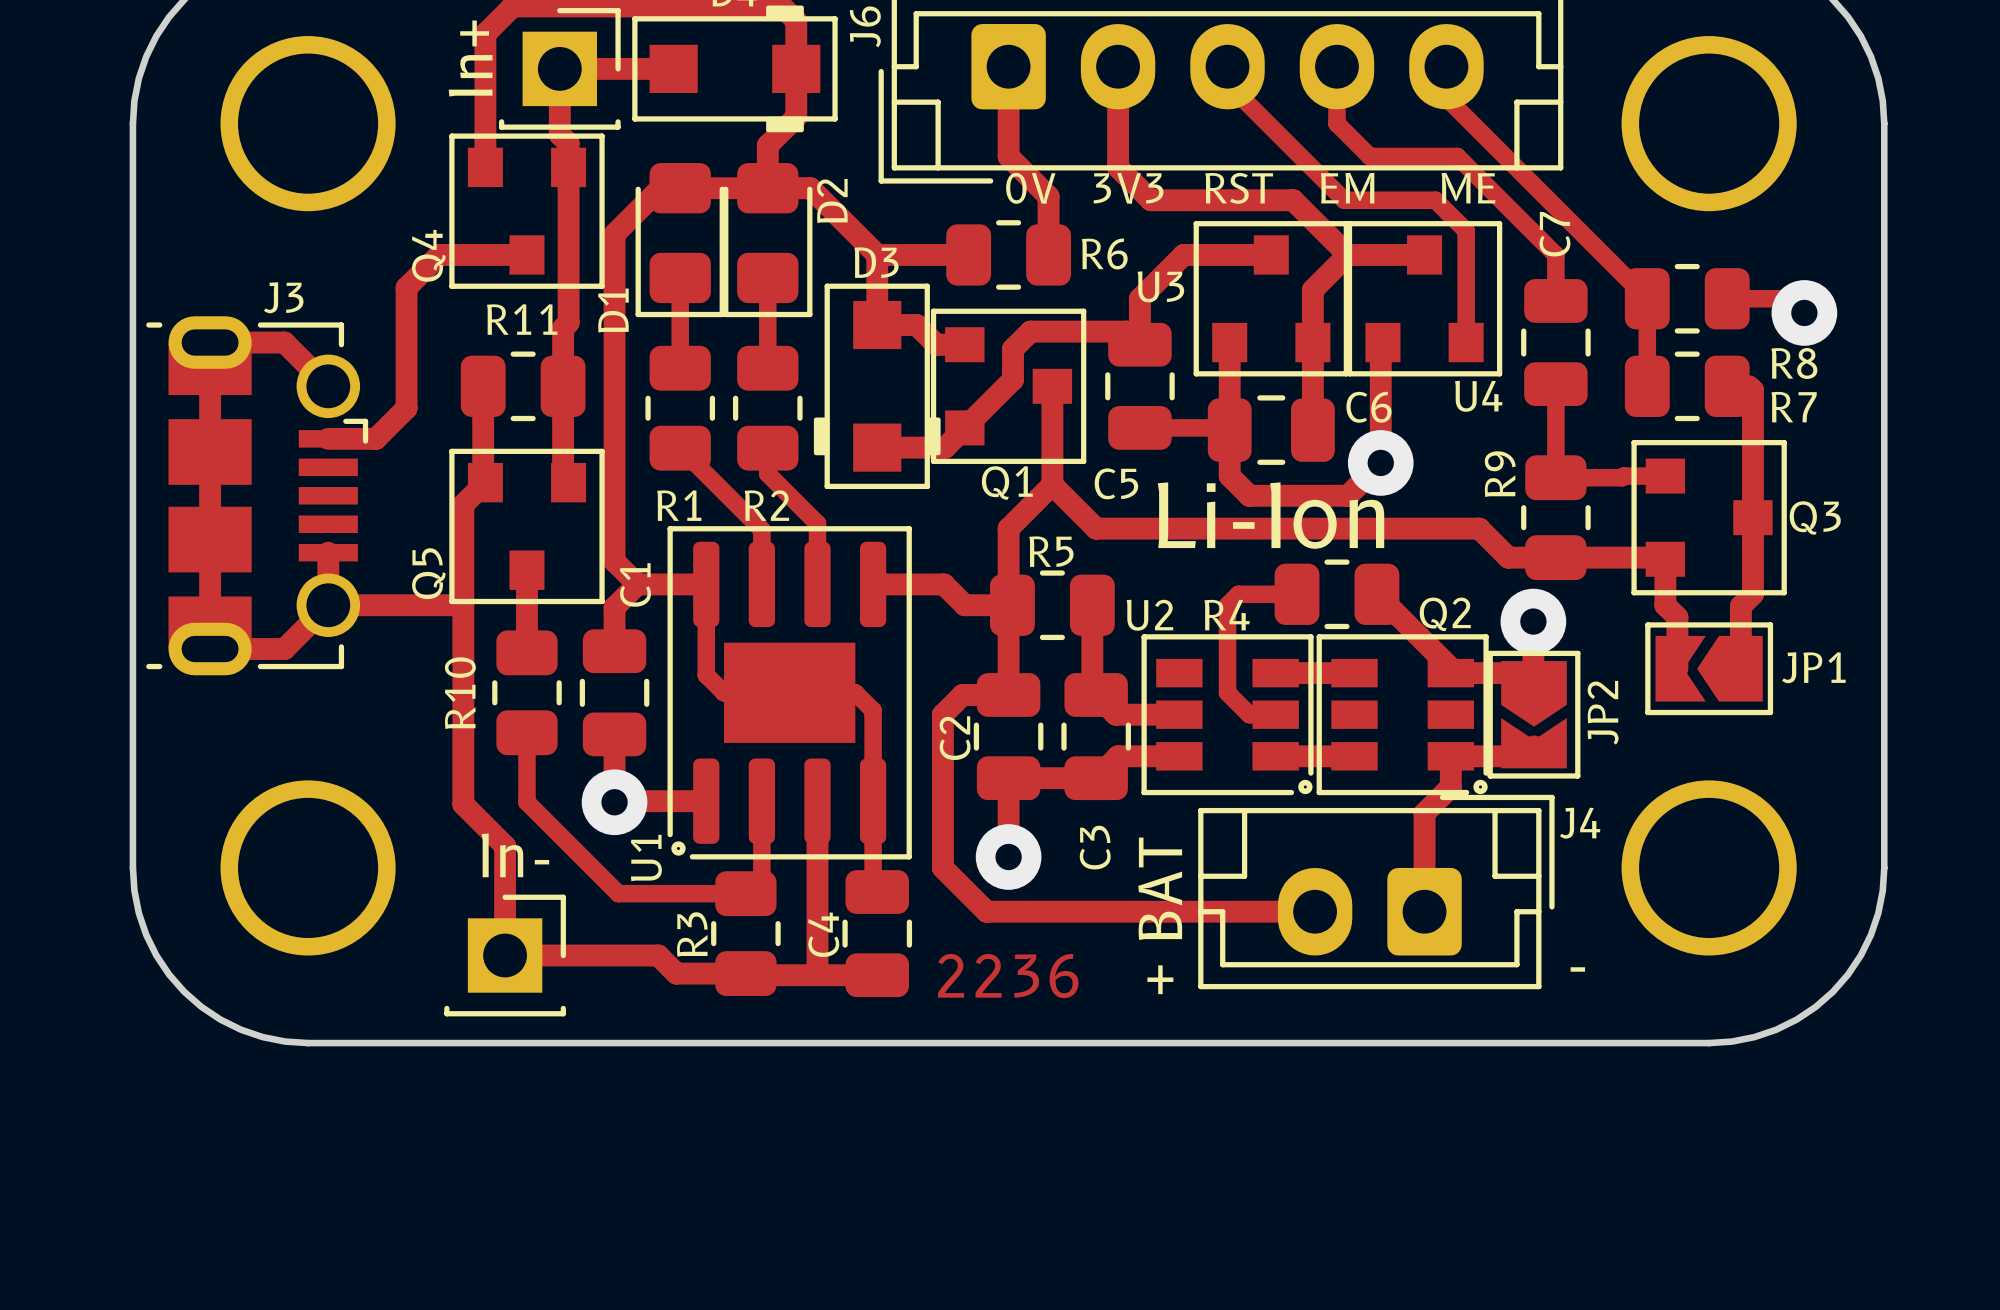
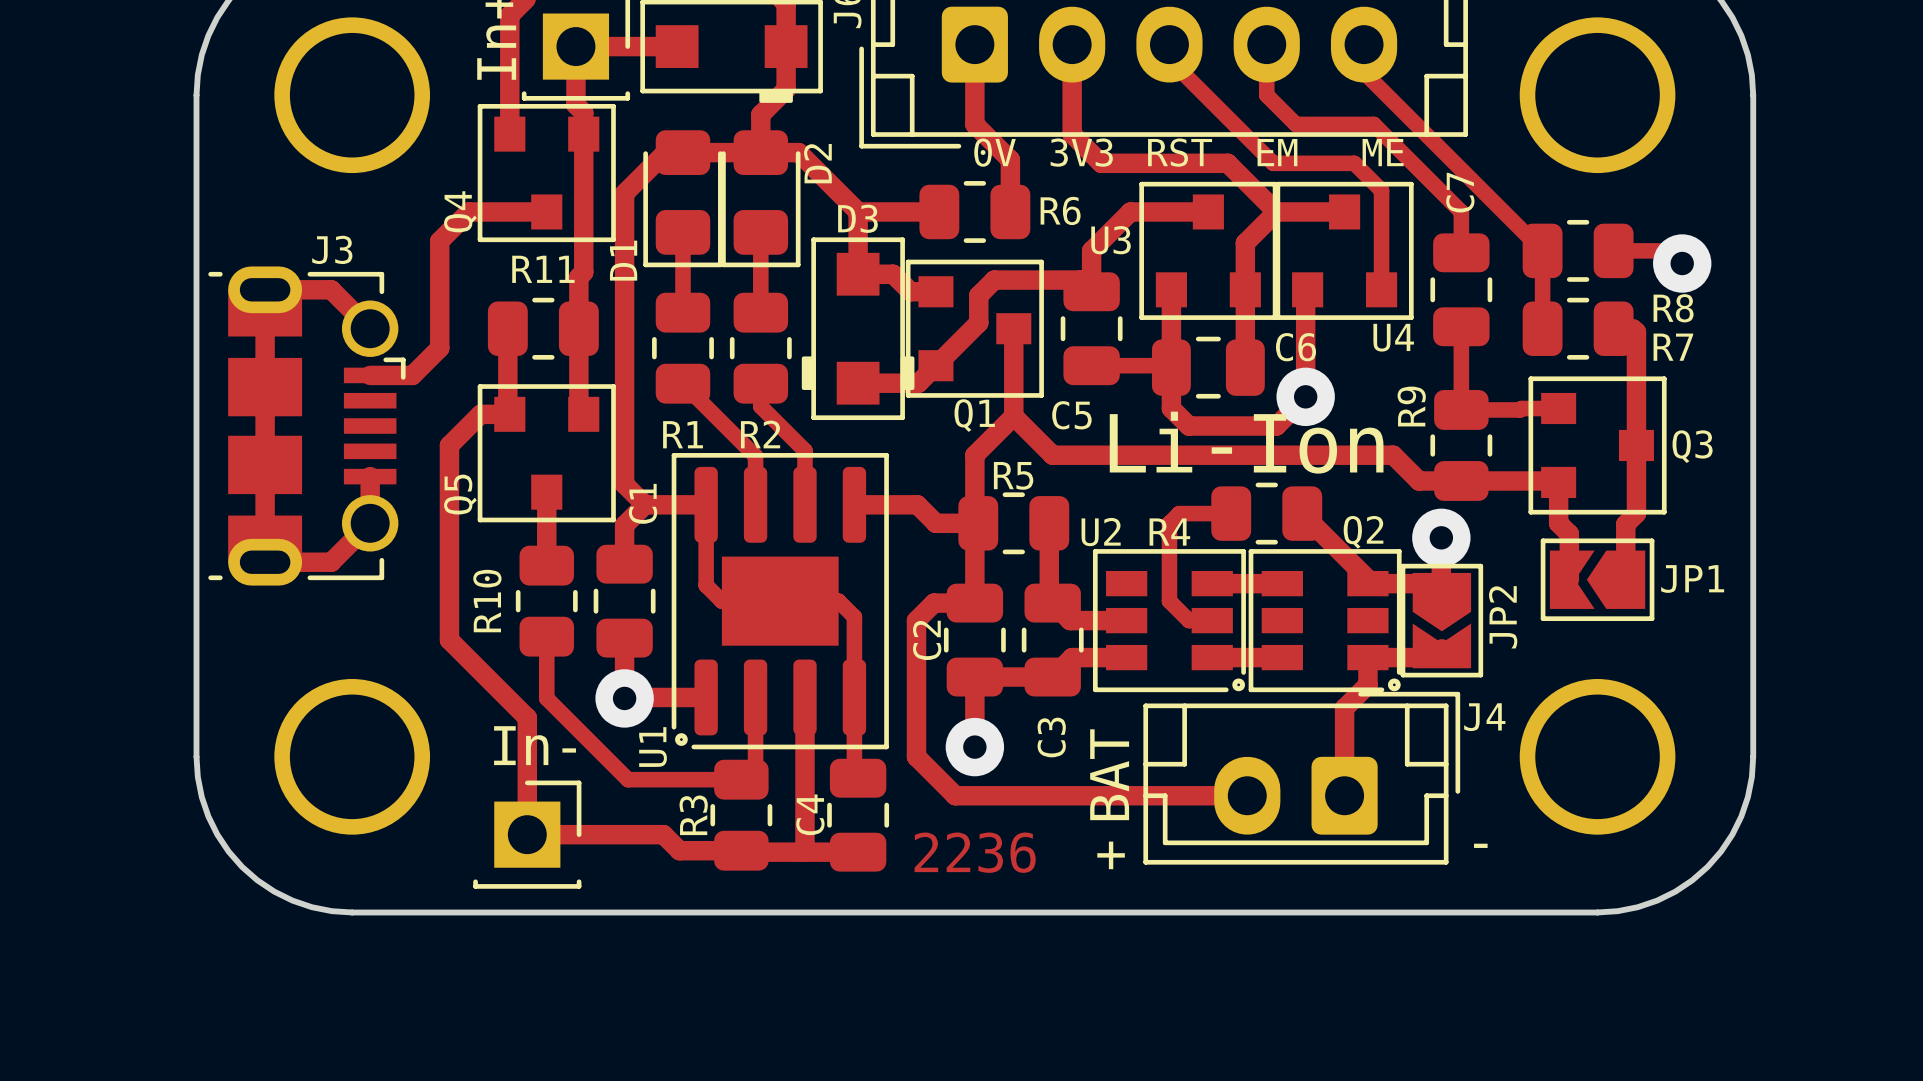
track: (485, 482) (463, 504) (463, 804) (505, 846) -> (507, 412) (509, 414) (480, 414) (449, 445) (449, 640) (527, 717) (527, 737)
track: (463, 603) (461, 605) (328, 605) -> none

